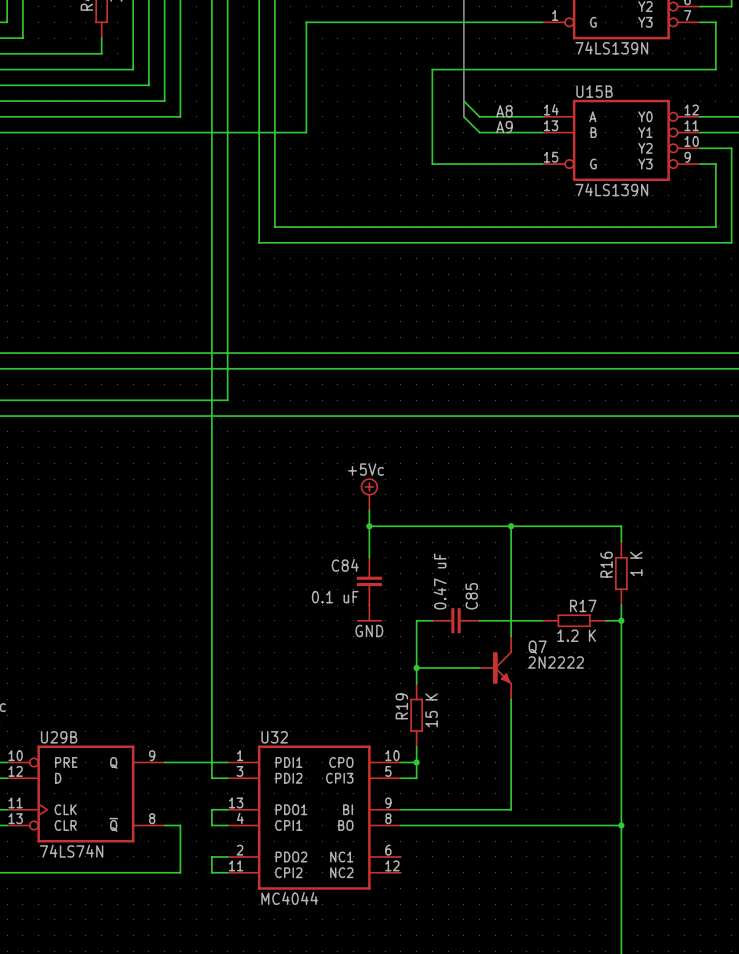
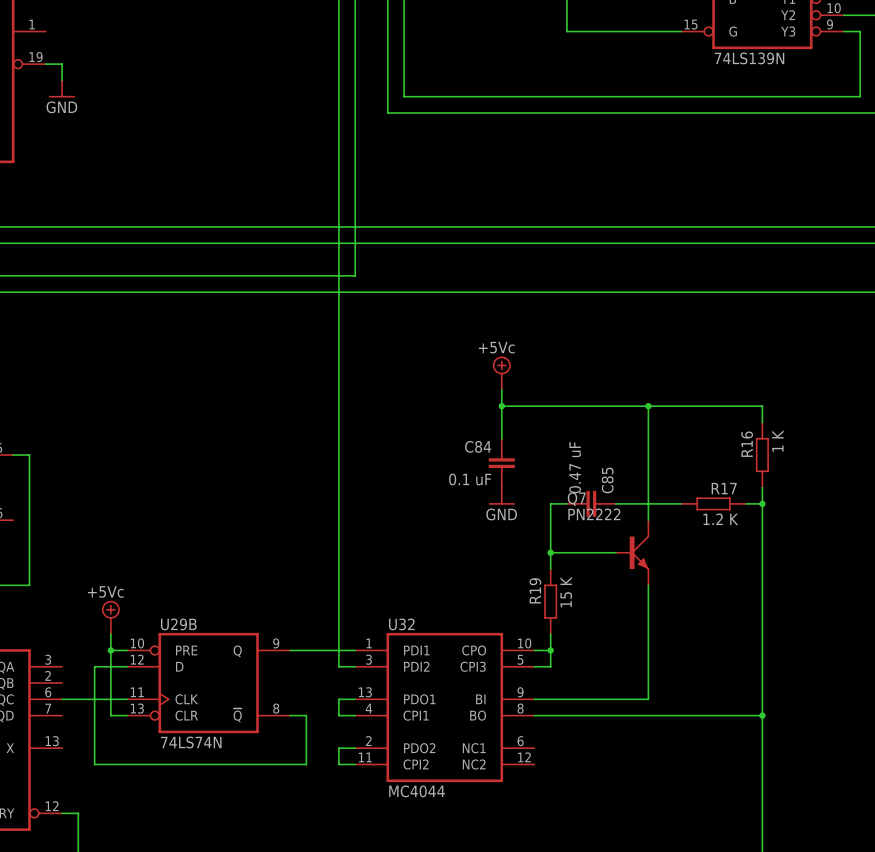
Q7 name position: Q7 (537, 647) -> Q7 (576, 499)
Q7 value: 2N2222 (556, 662) -> PN2222 (594, 514)

